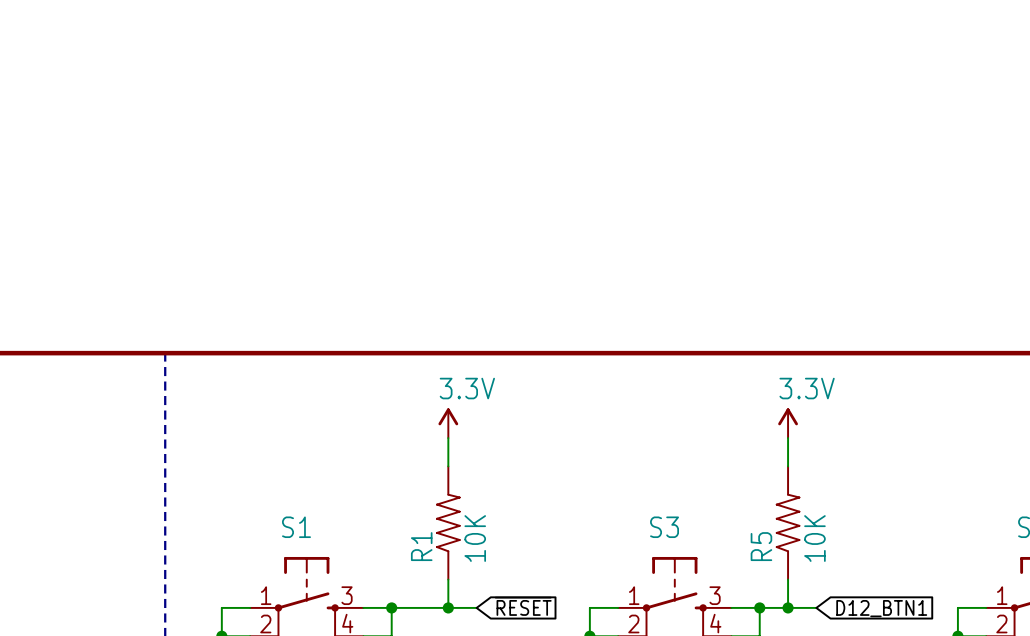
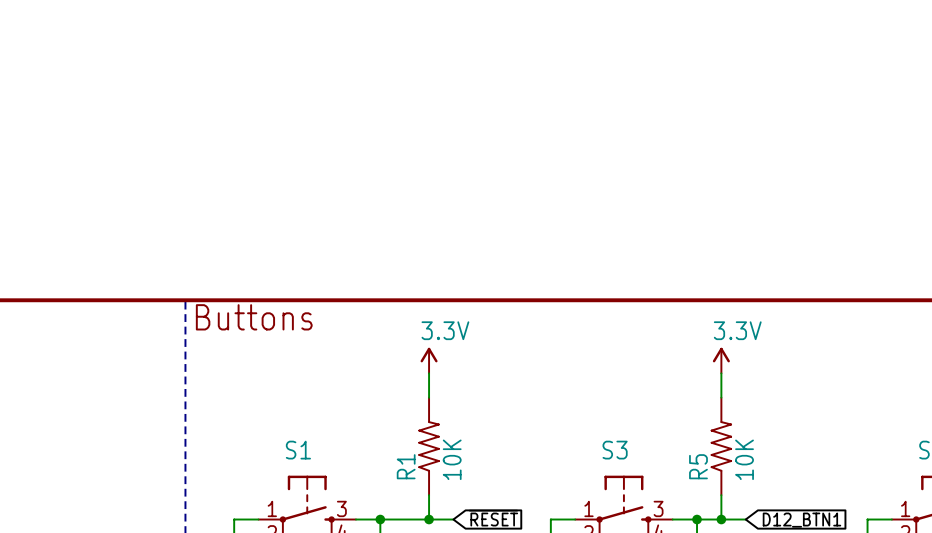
text: none -> Buttons (254, 317)

